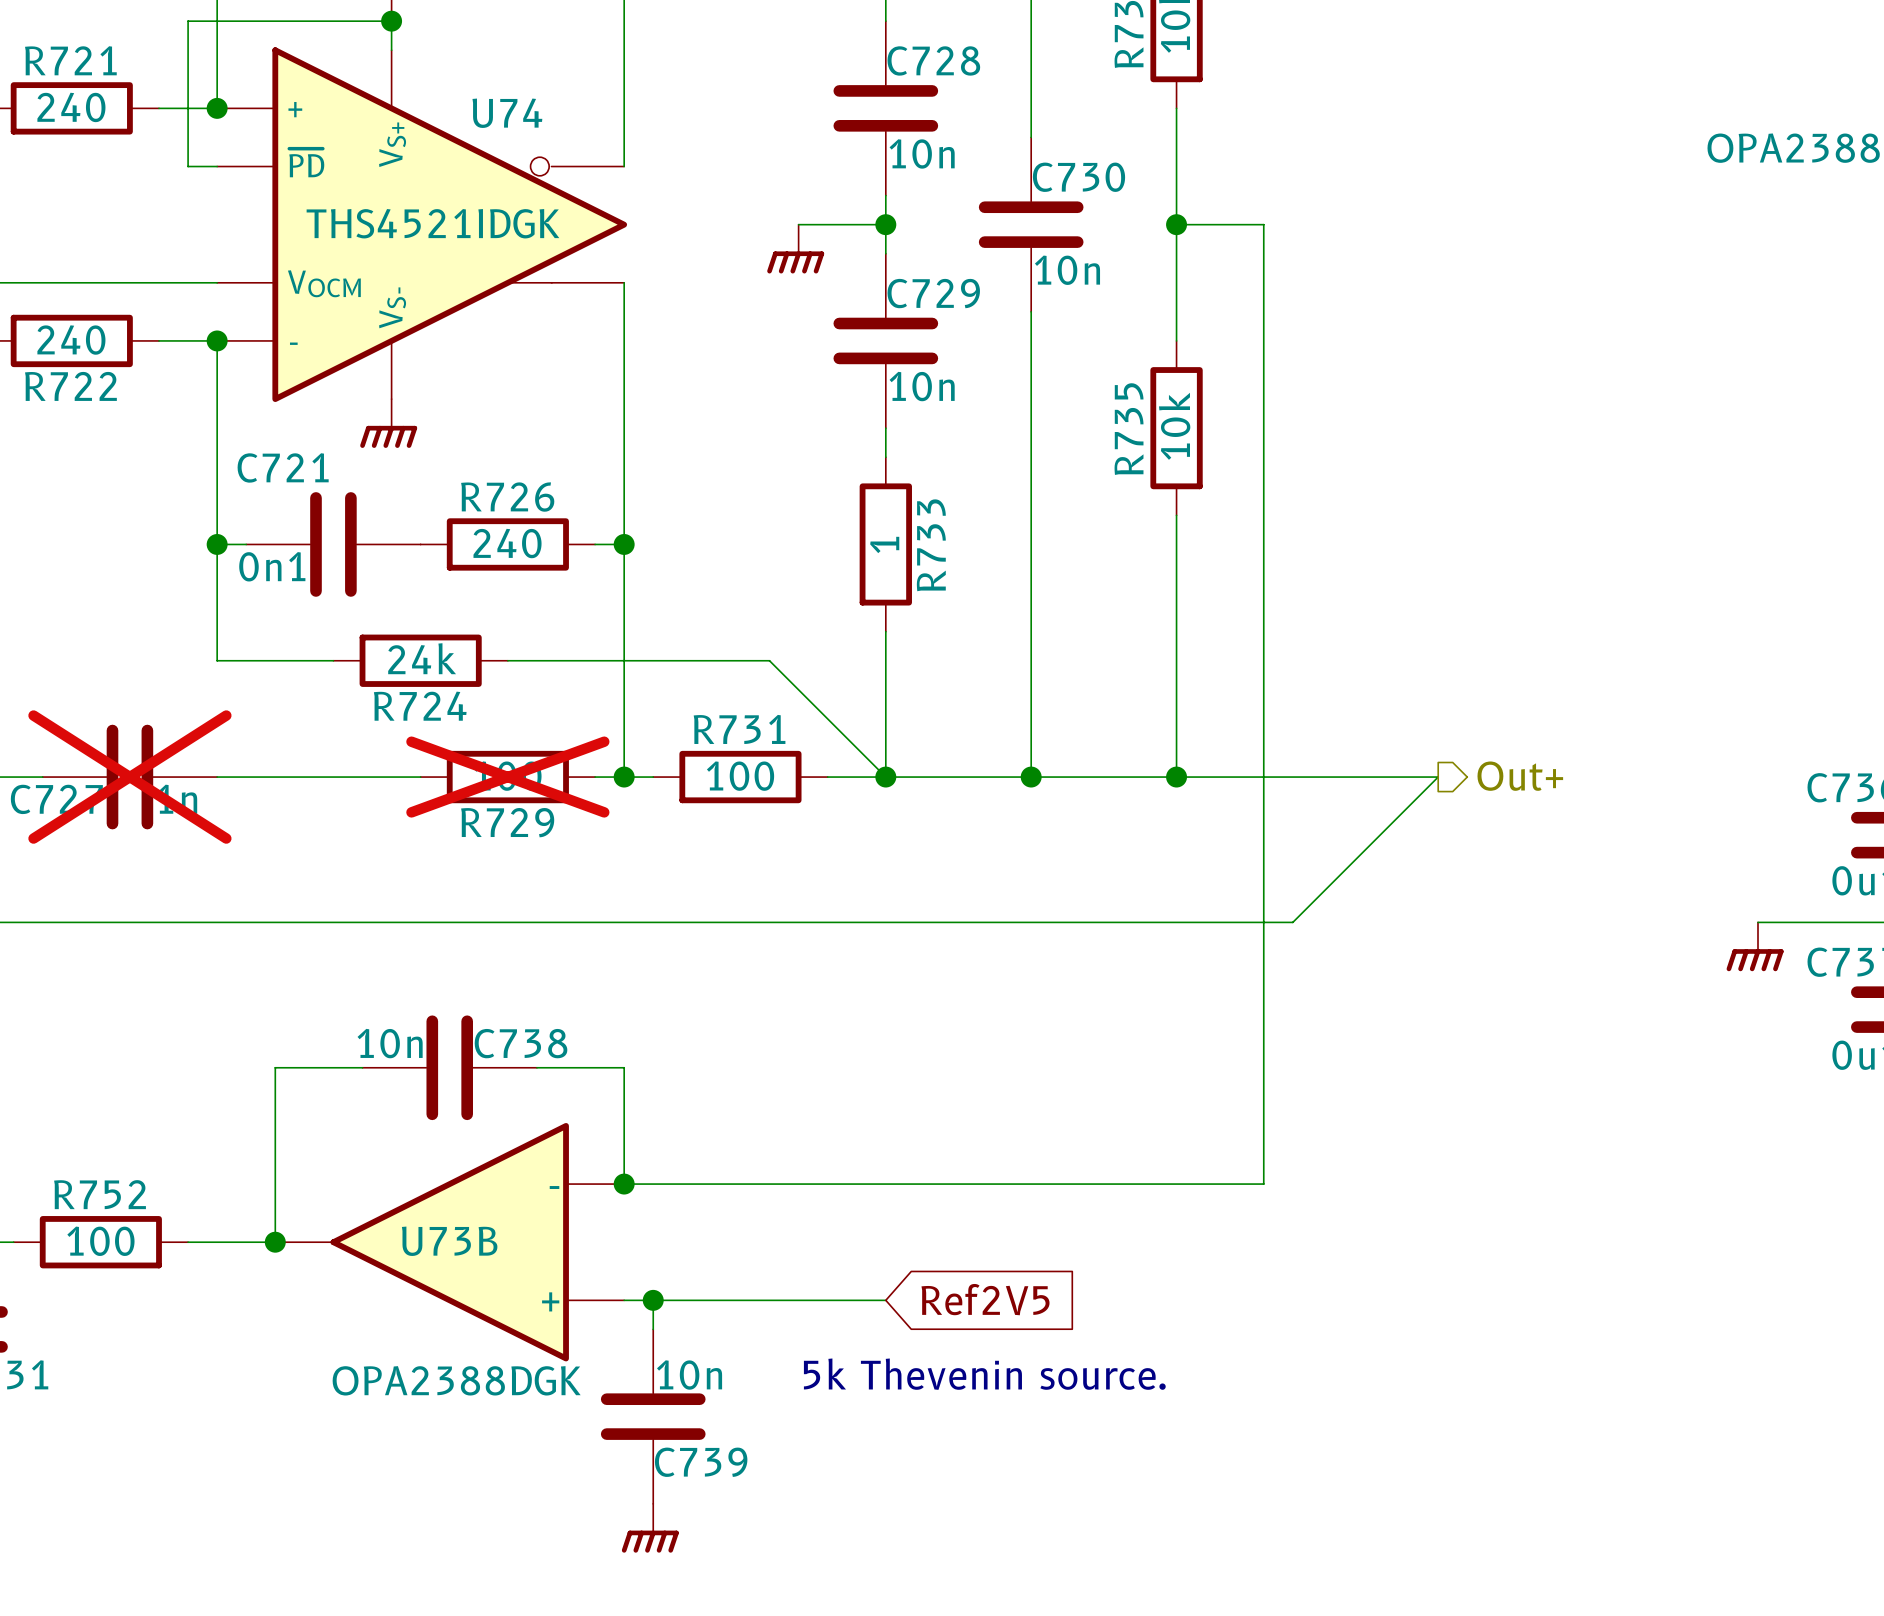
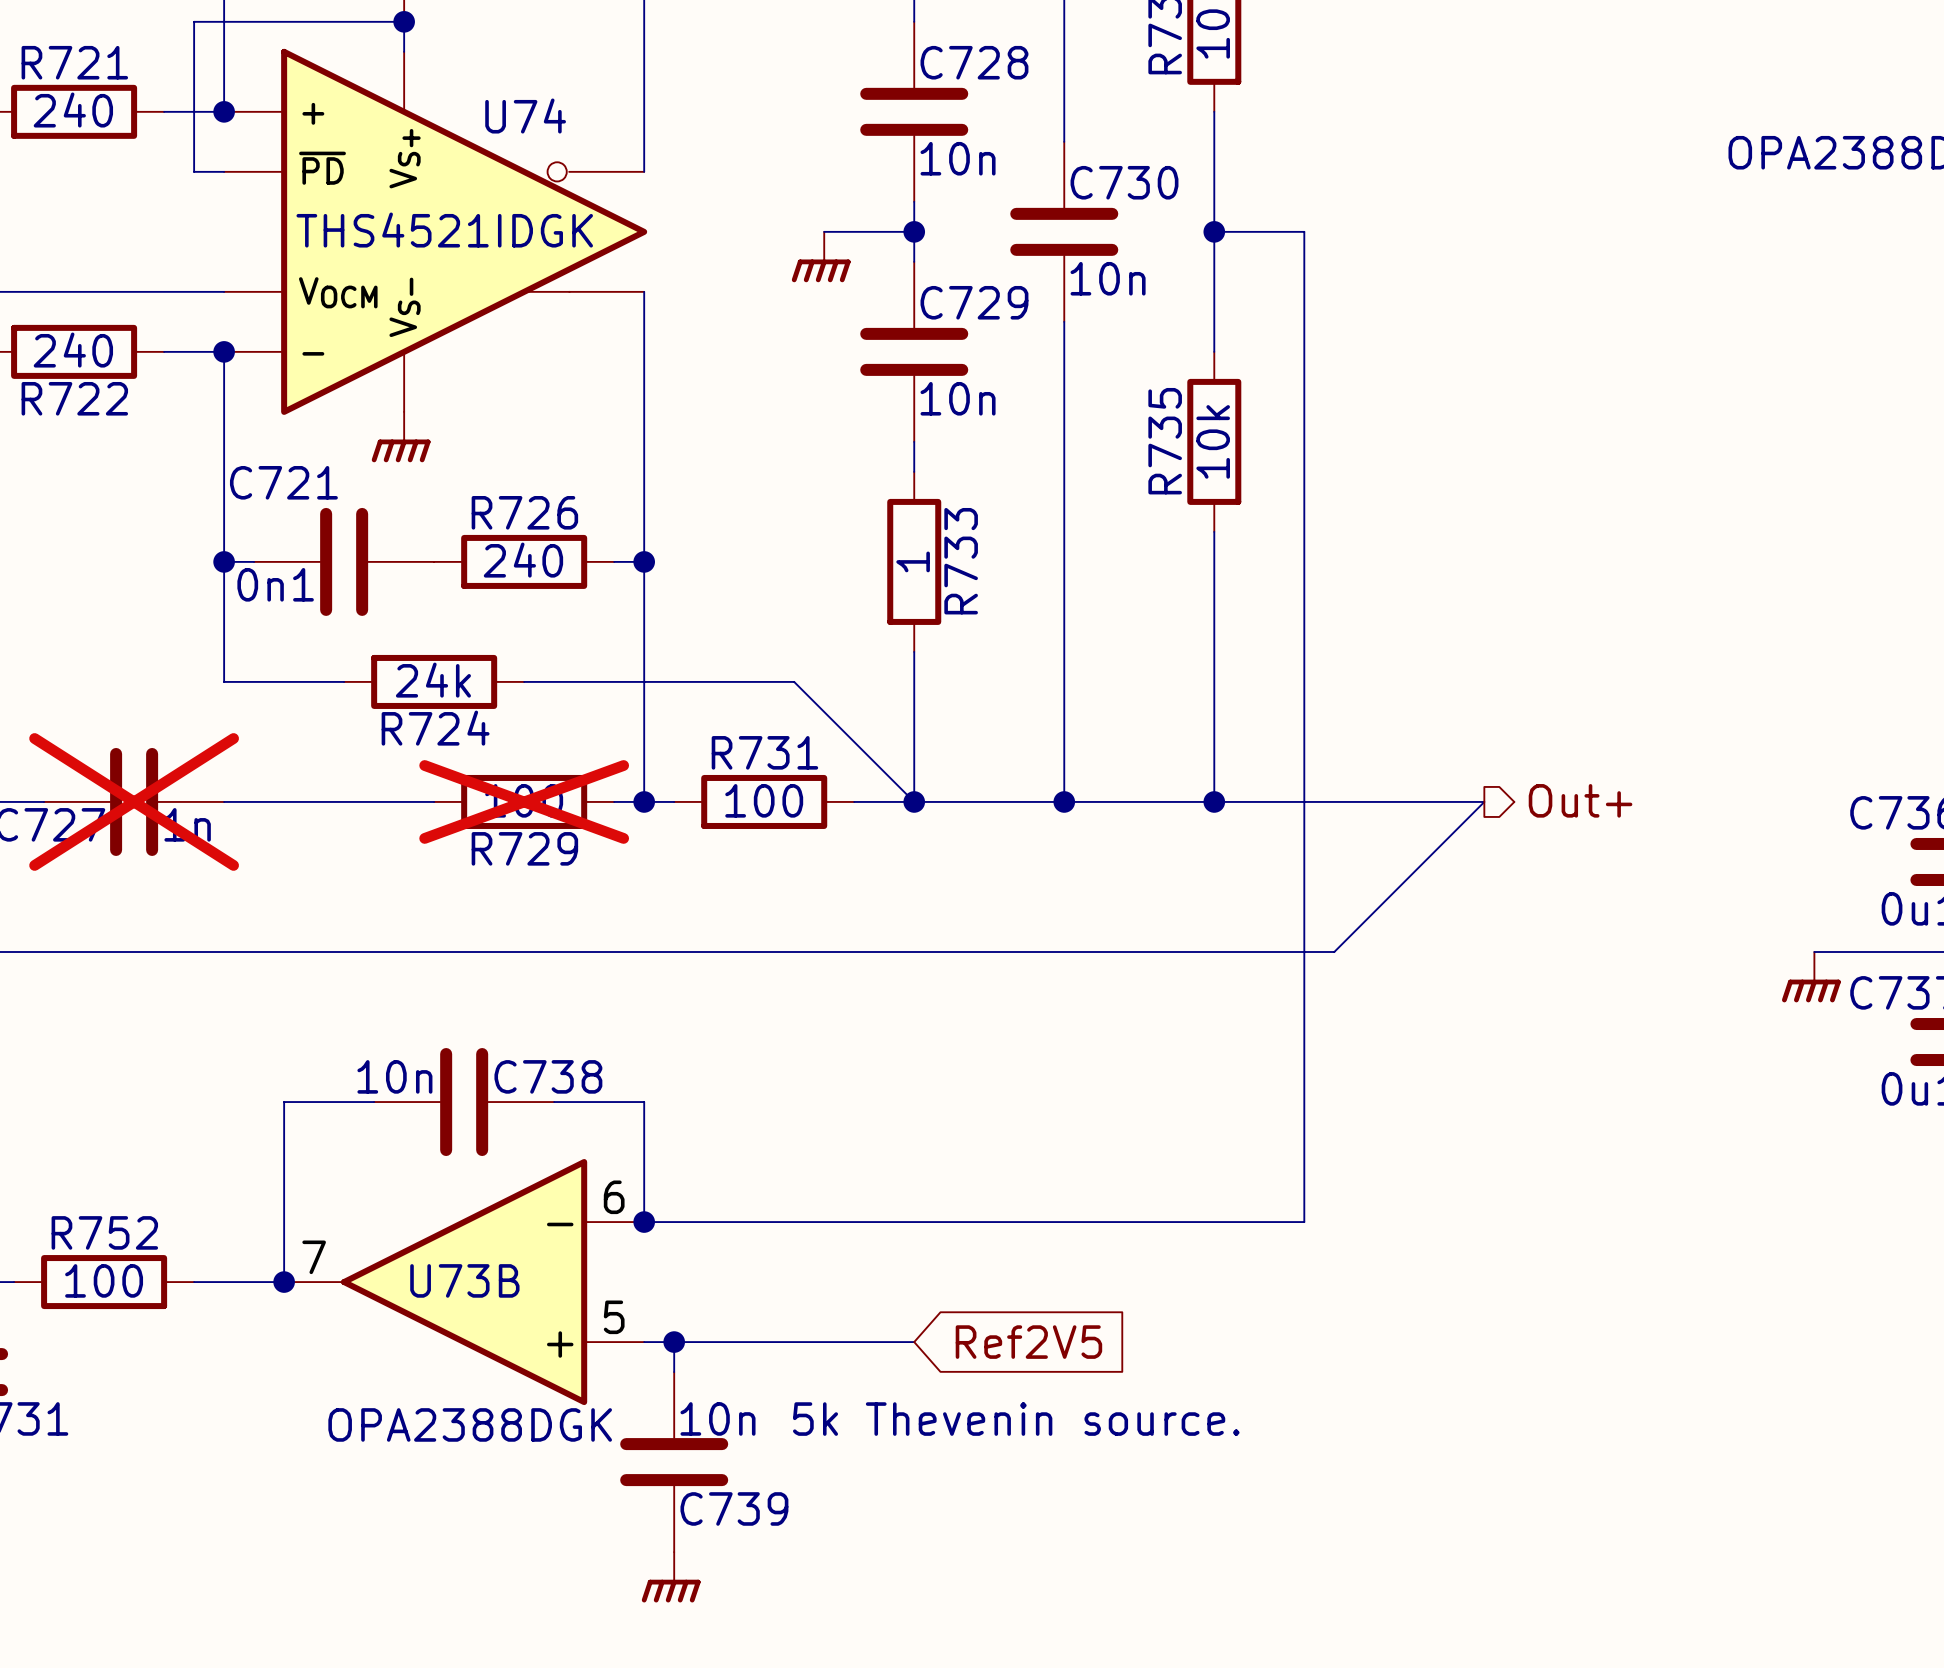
U73B pin number: none -> 6 (614, 1197)
U73B pin number: none -> 7 (314, 1257)
U73B pin number: none -> 5 (614, 1317)

